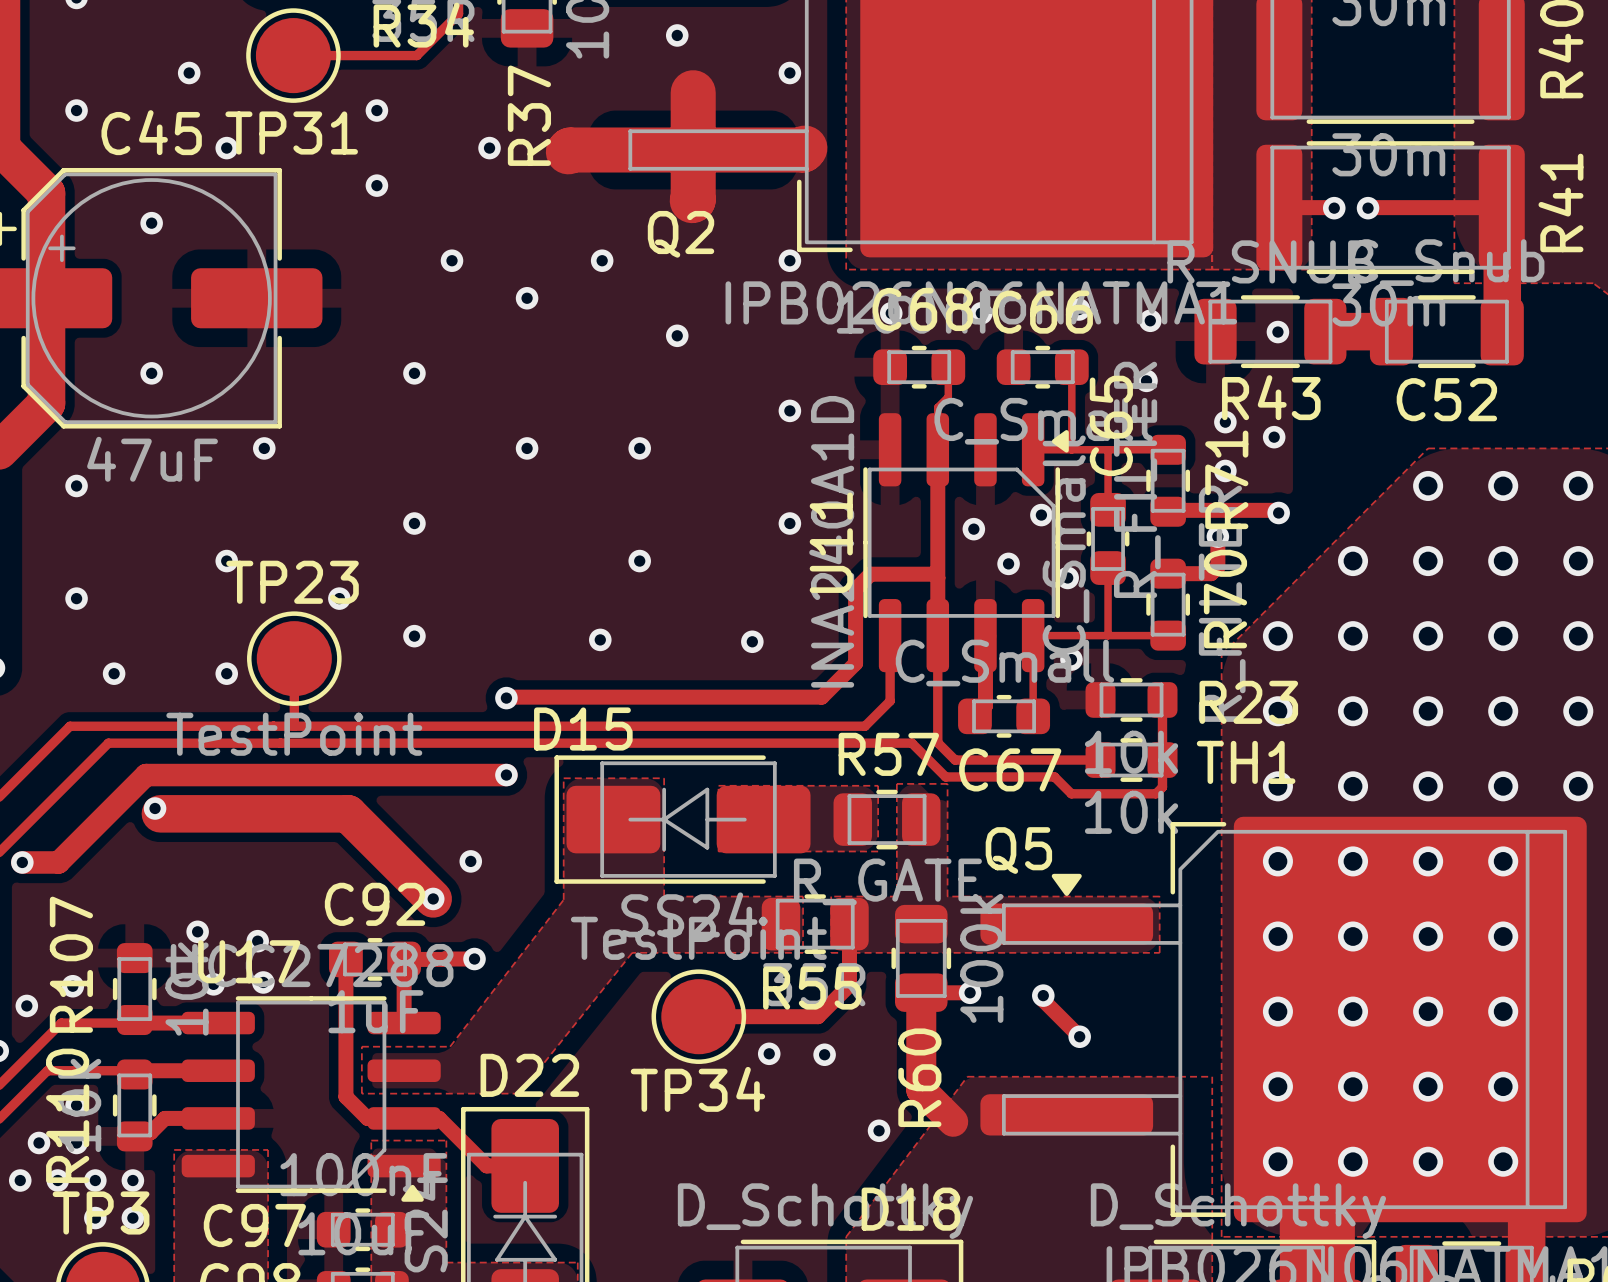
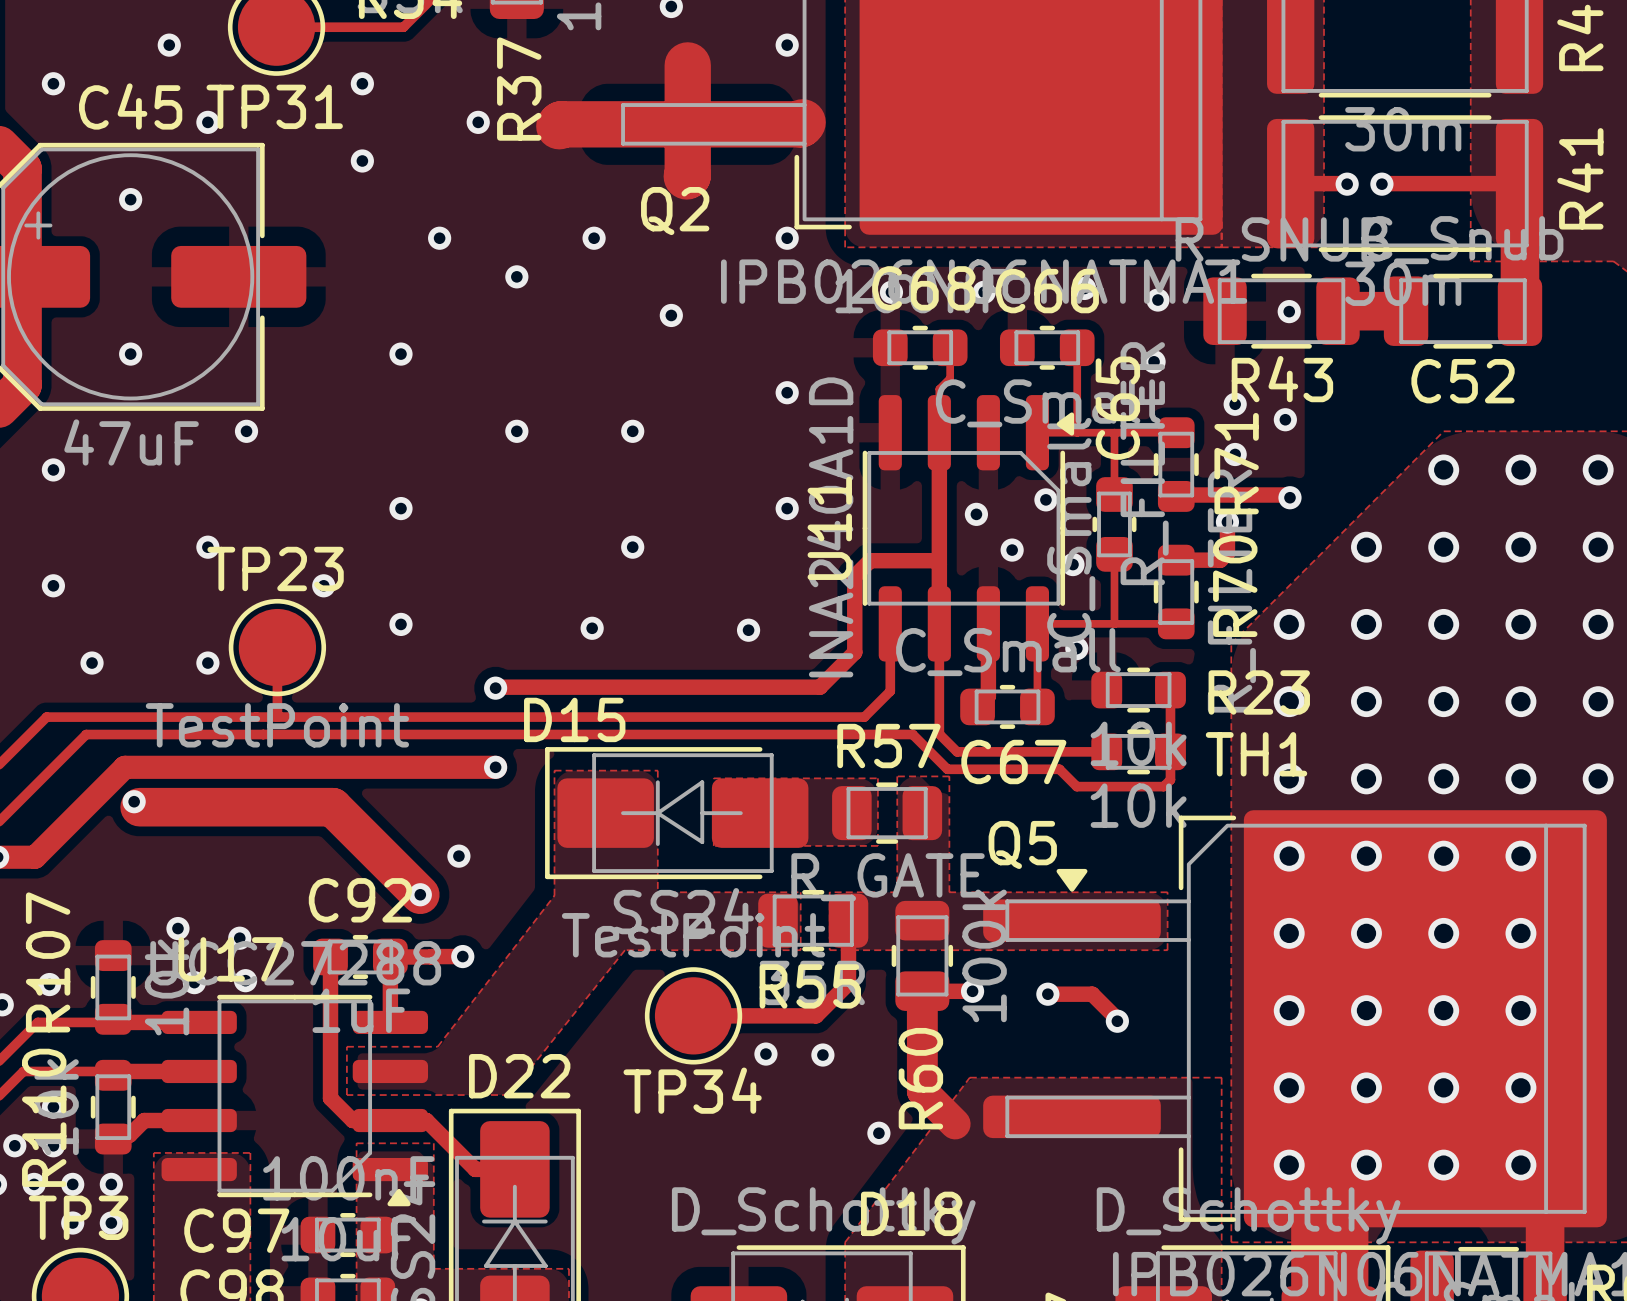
track: (1043, 995) (1043, 1000) (1079, 1036) -> (1047, 994) (1092, 994) (1117, 1021)
via position: (1079, 1036) -> (1117, 1021)

